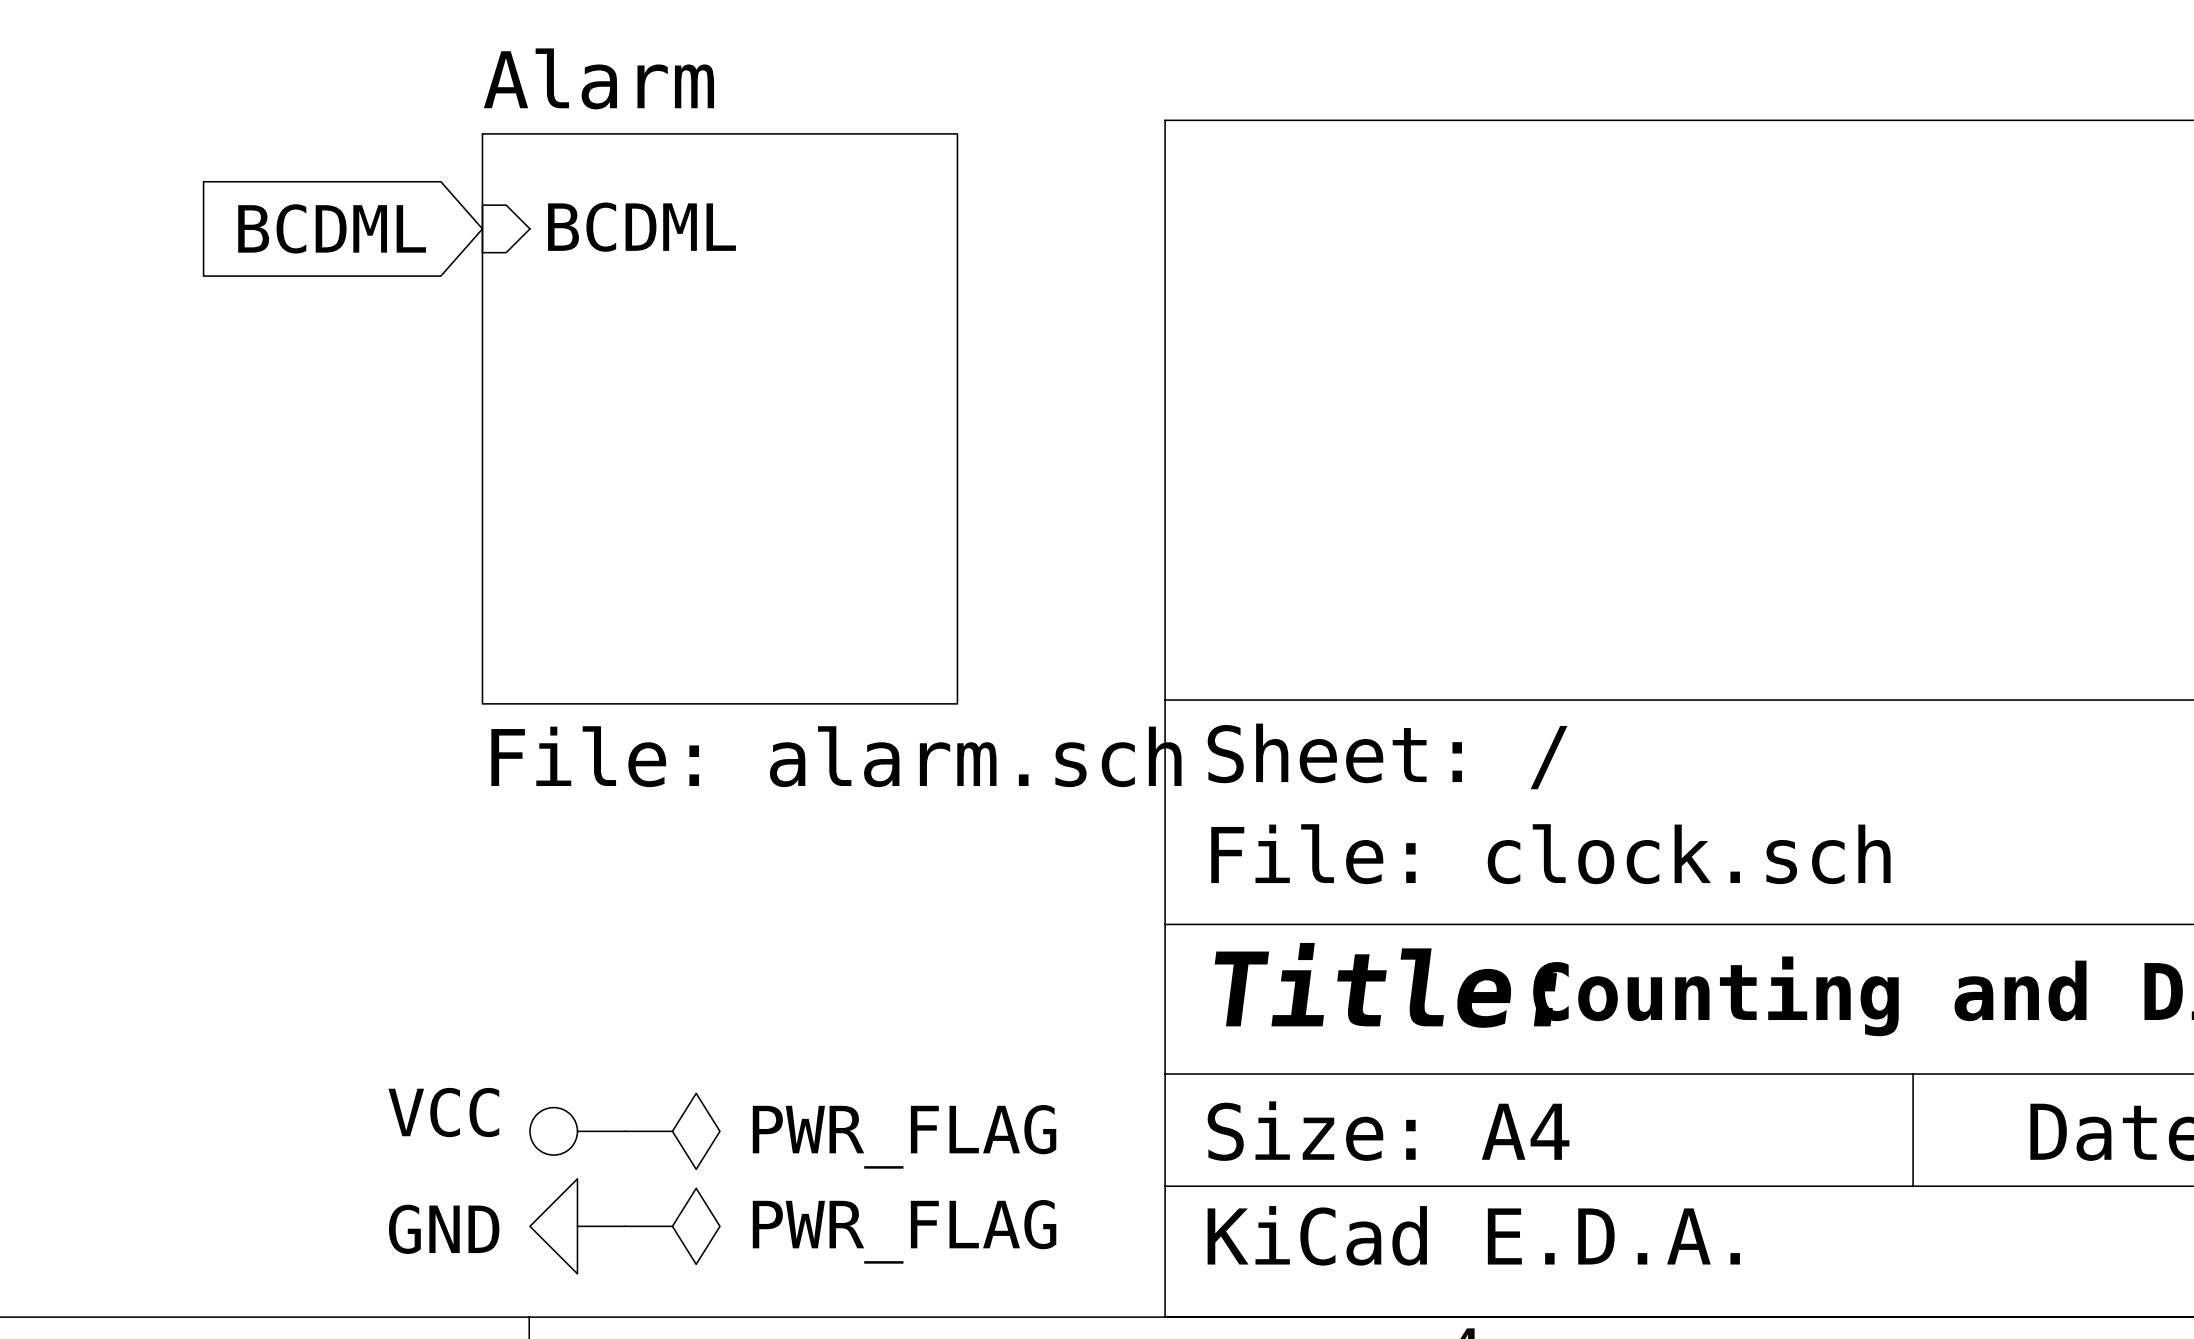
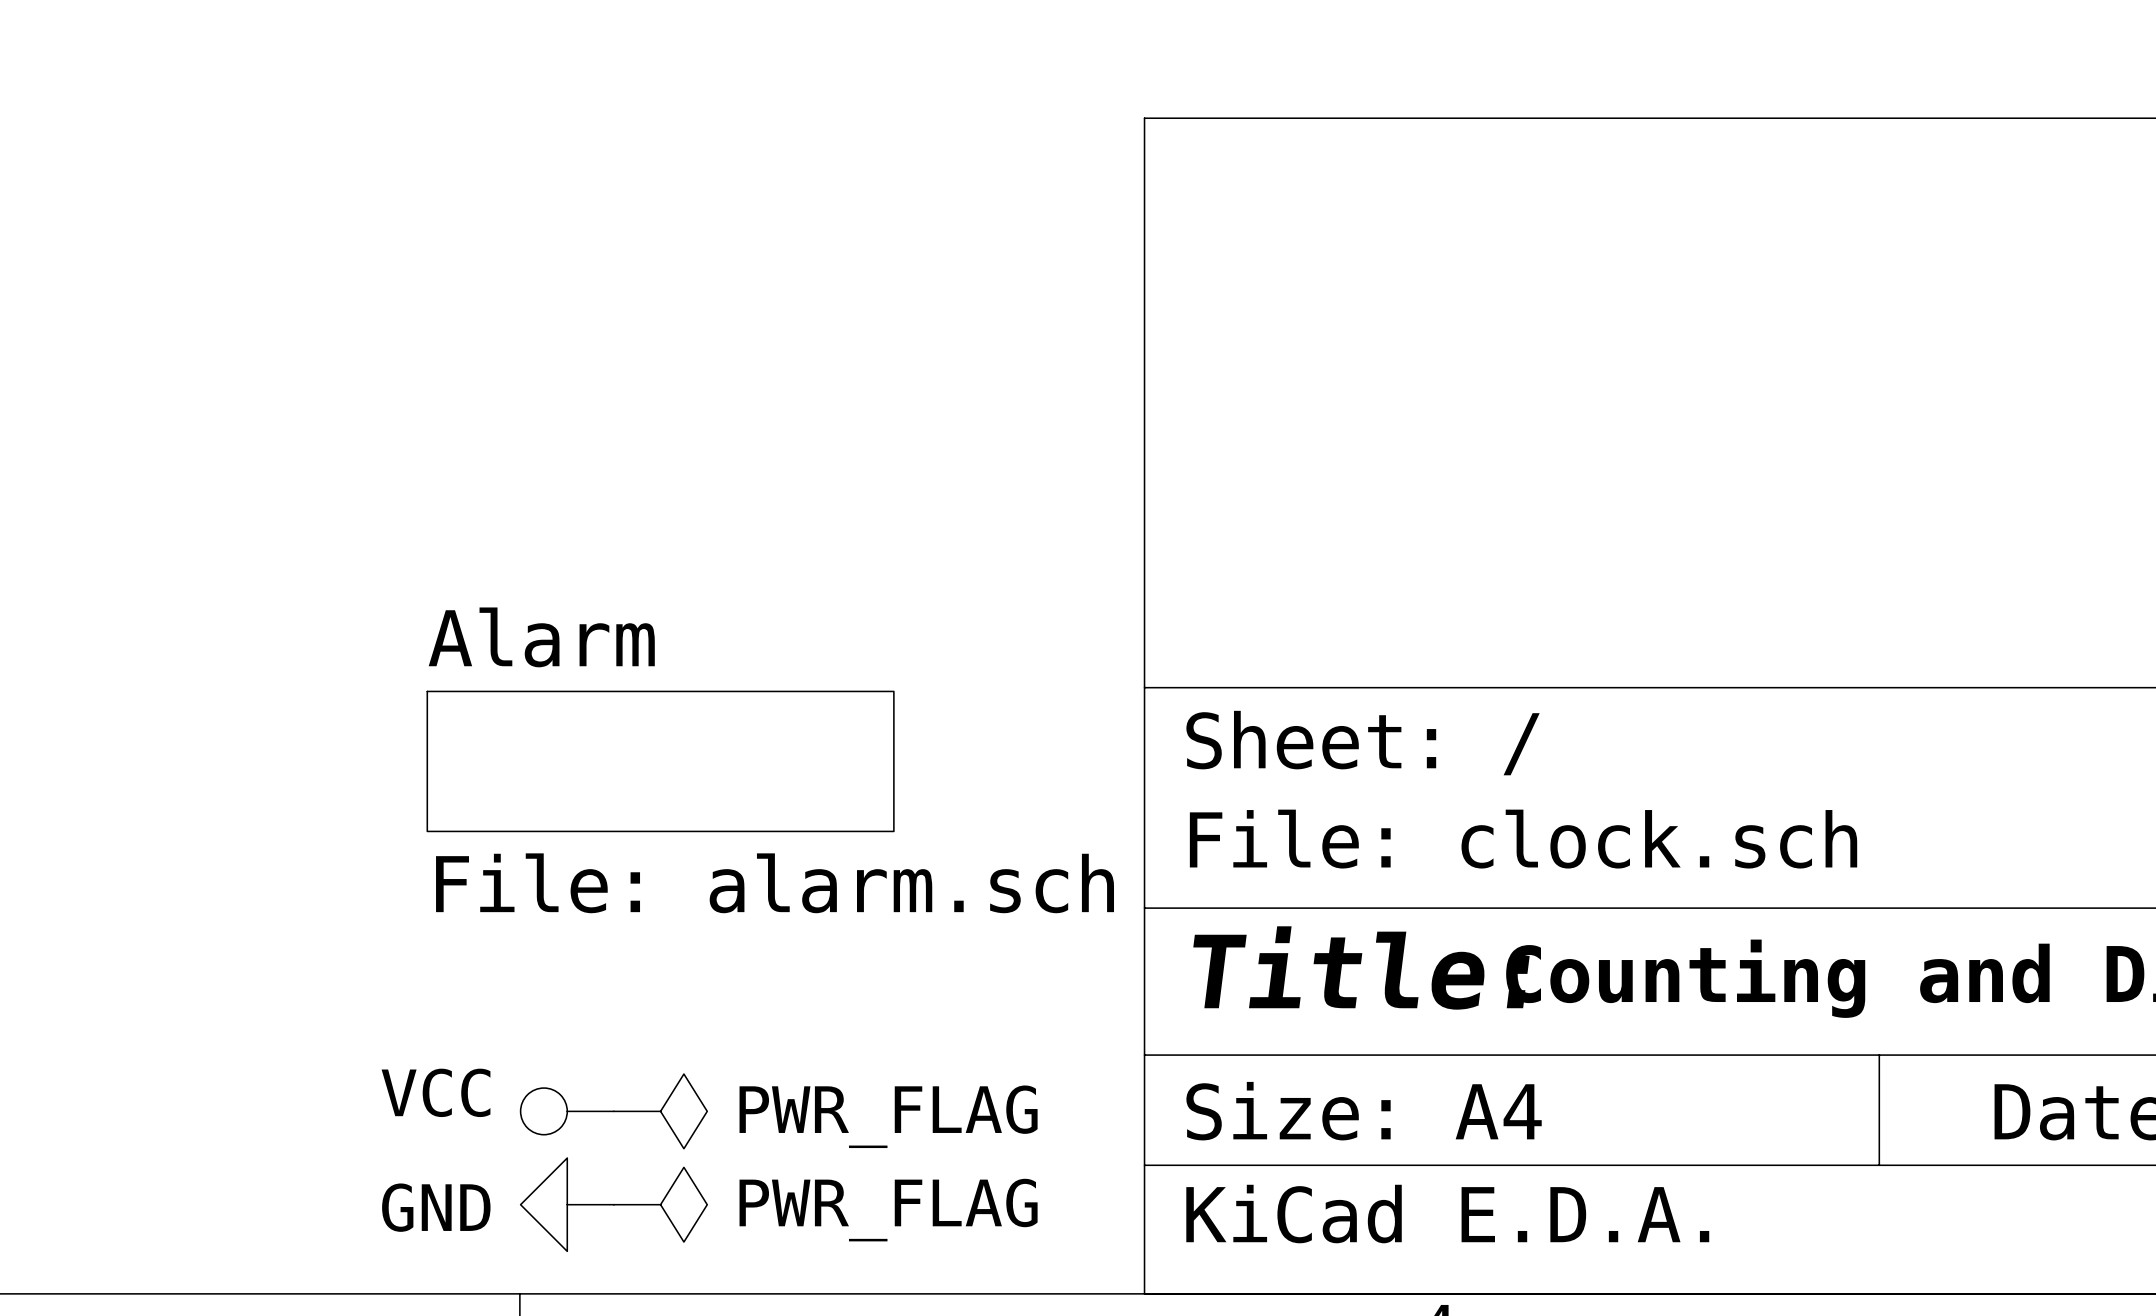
sheet pin: BCDML (641, 227) -> none
global label: BCDML (332, 228) -> none
sheet Alarm: File: alarm.sch (719, 418) -> none
sheet Alarm: none -> File: alarm.sch (660, 761)

